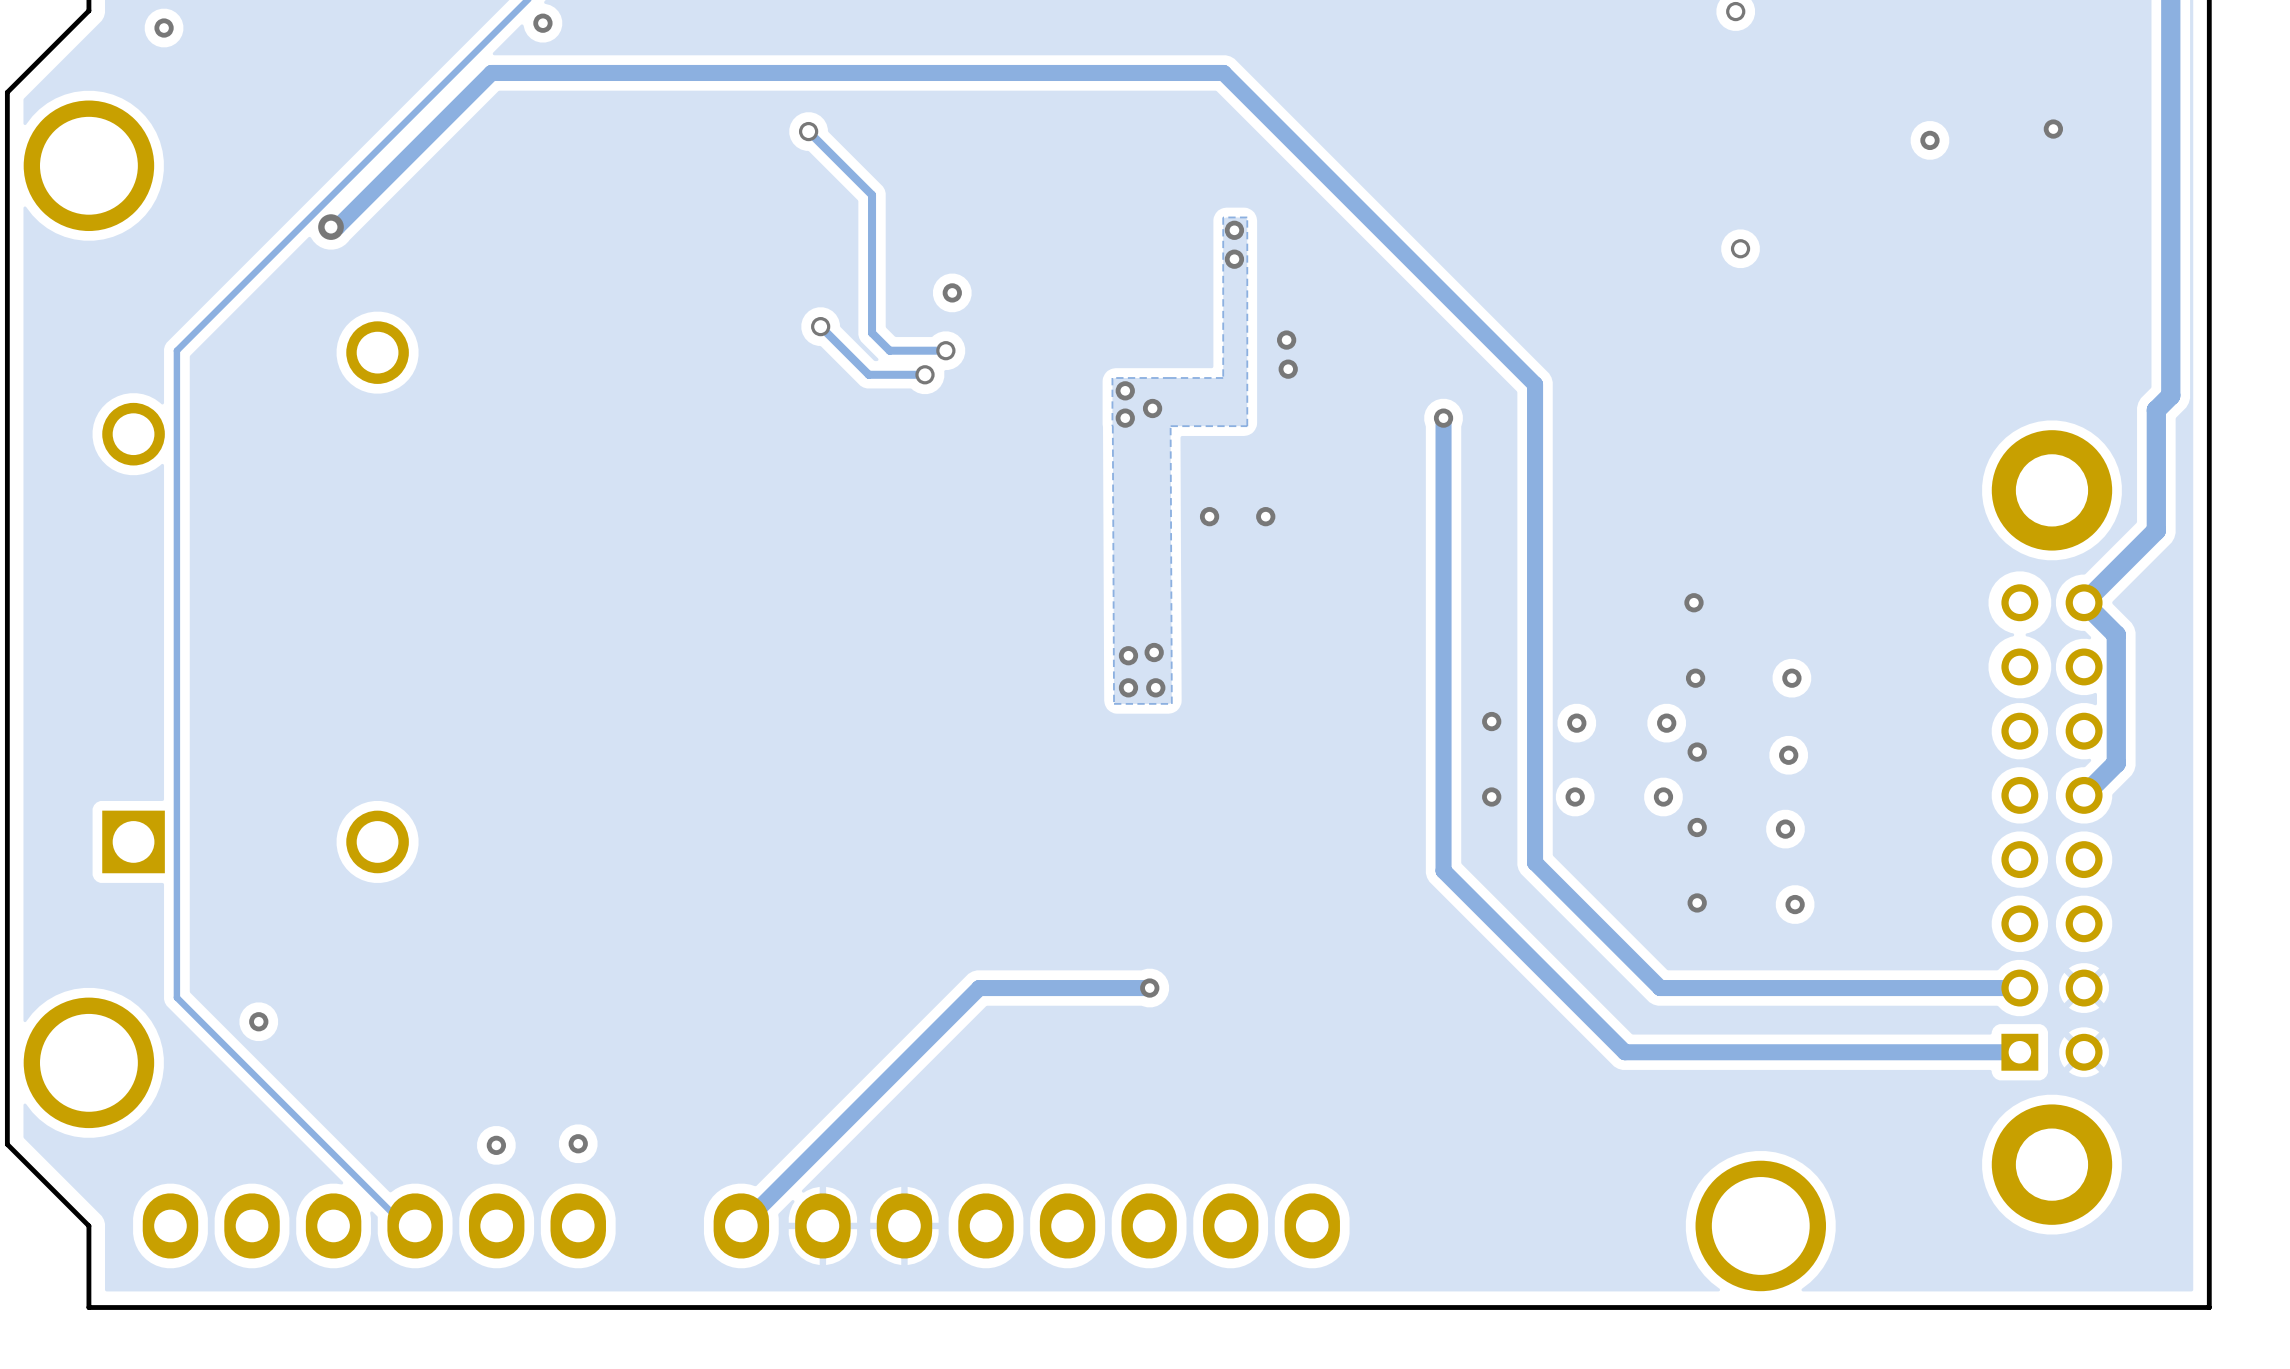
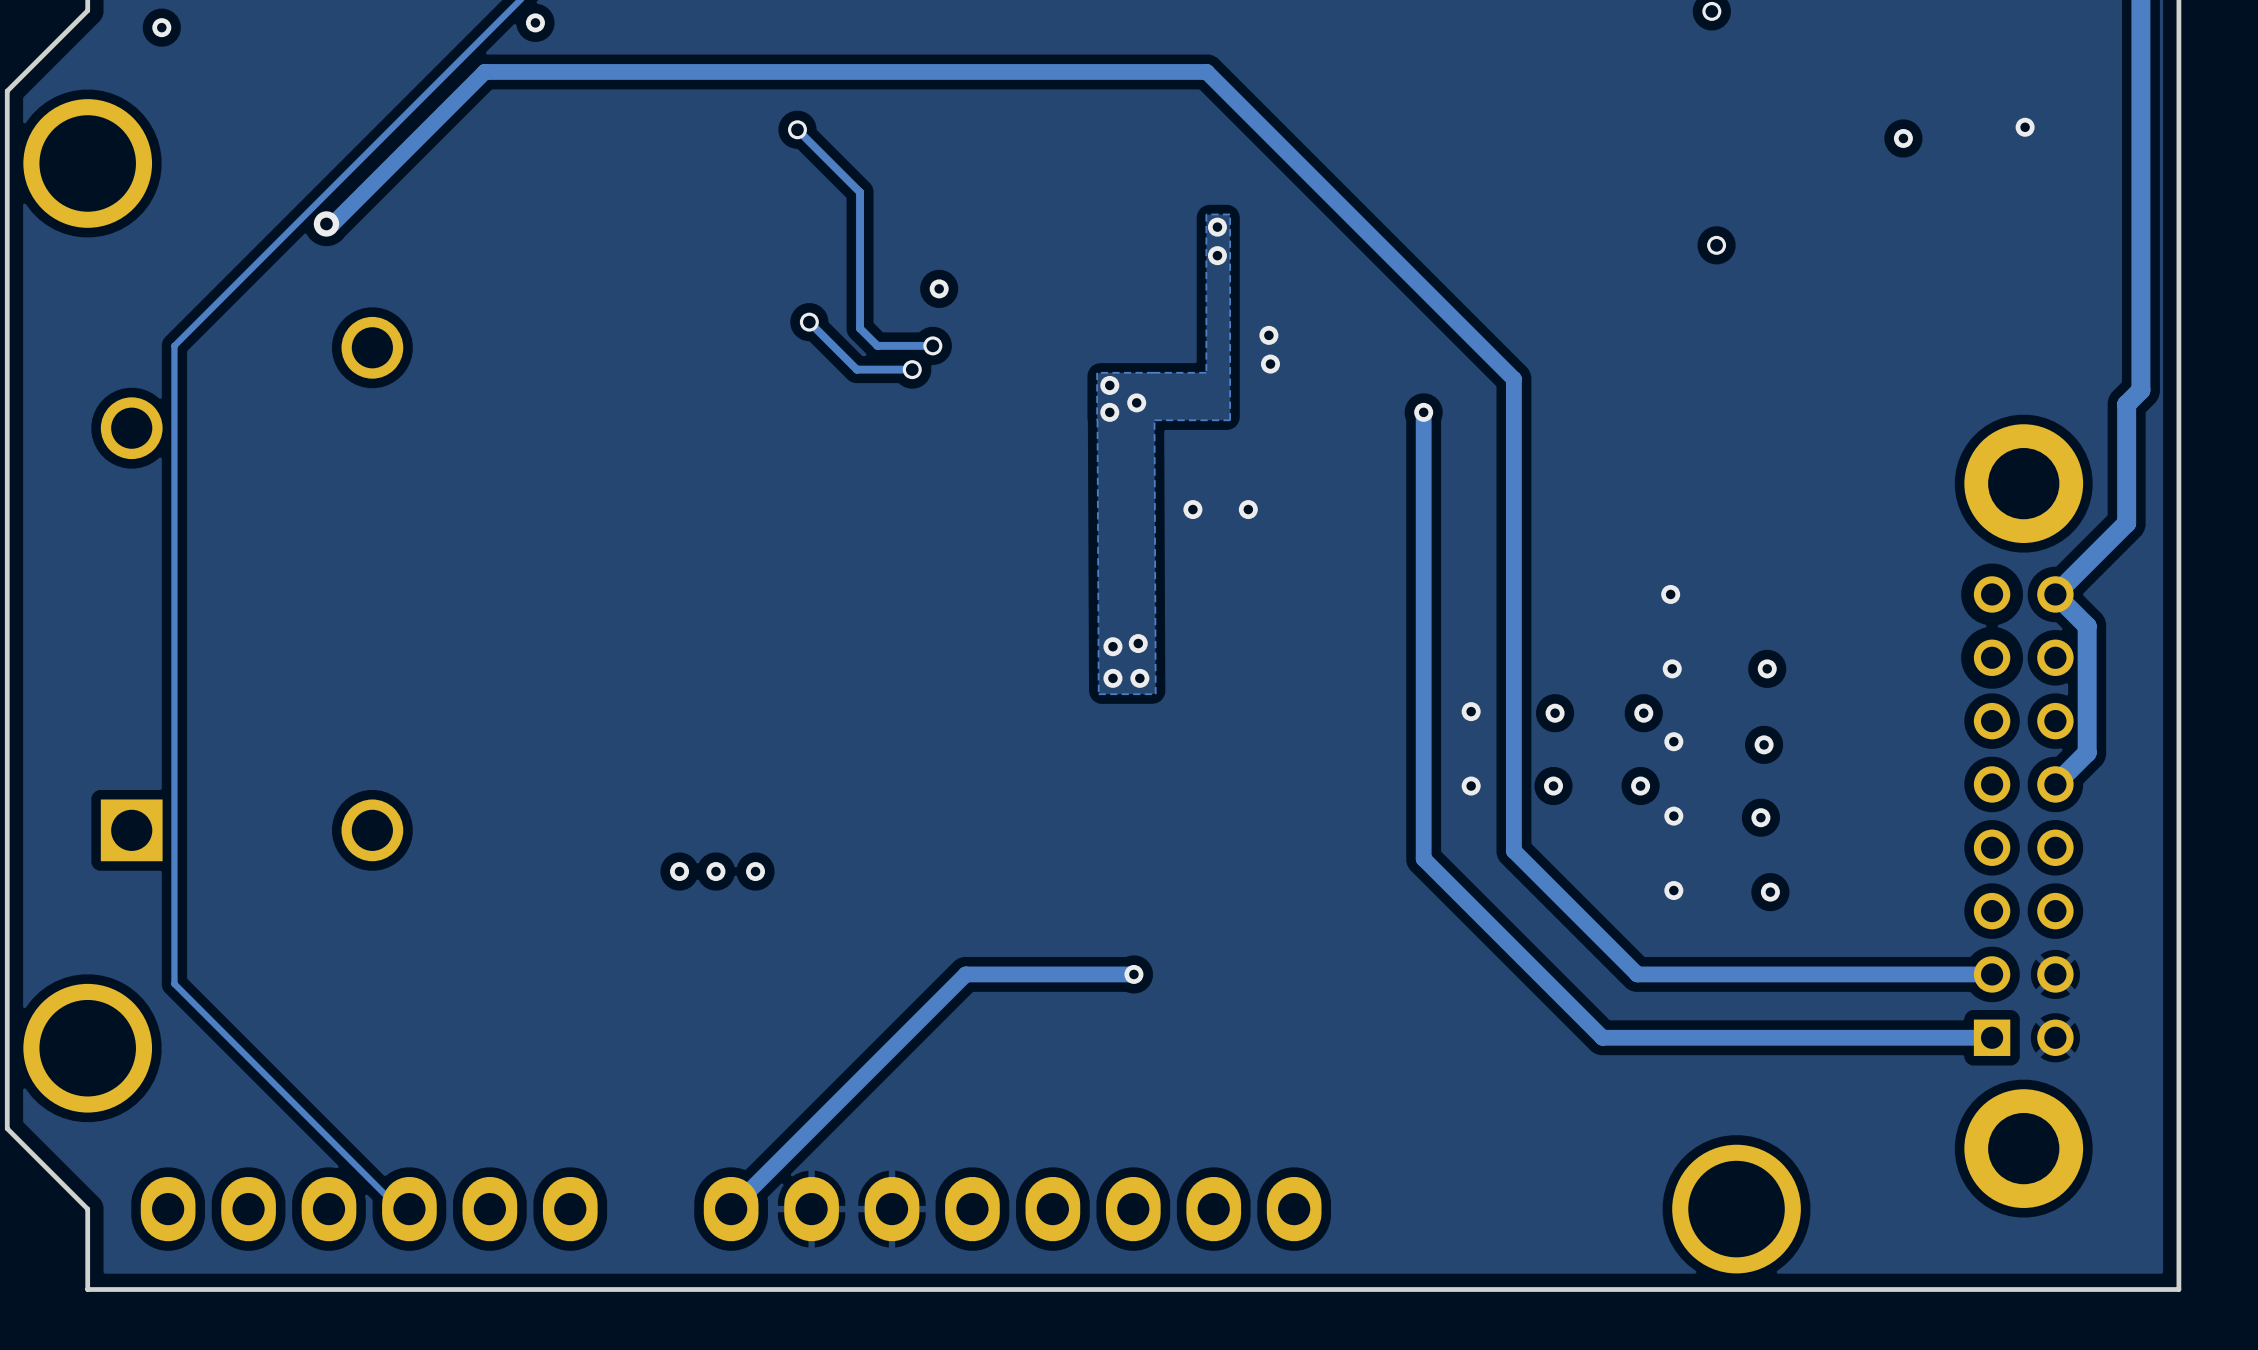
via: none -> (679, 871)
via: none -> (715, 871)
via: none -> (755, 871)
via: (258, 1021) -> none
via: (578, 1143) -> none
via: (496, 1145) -> none

